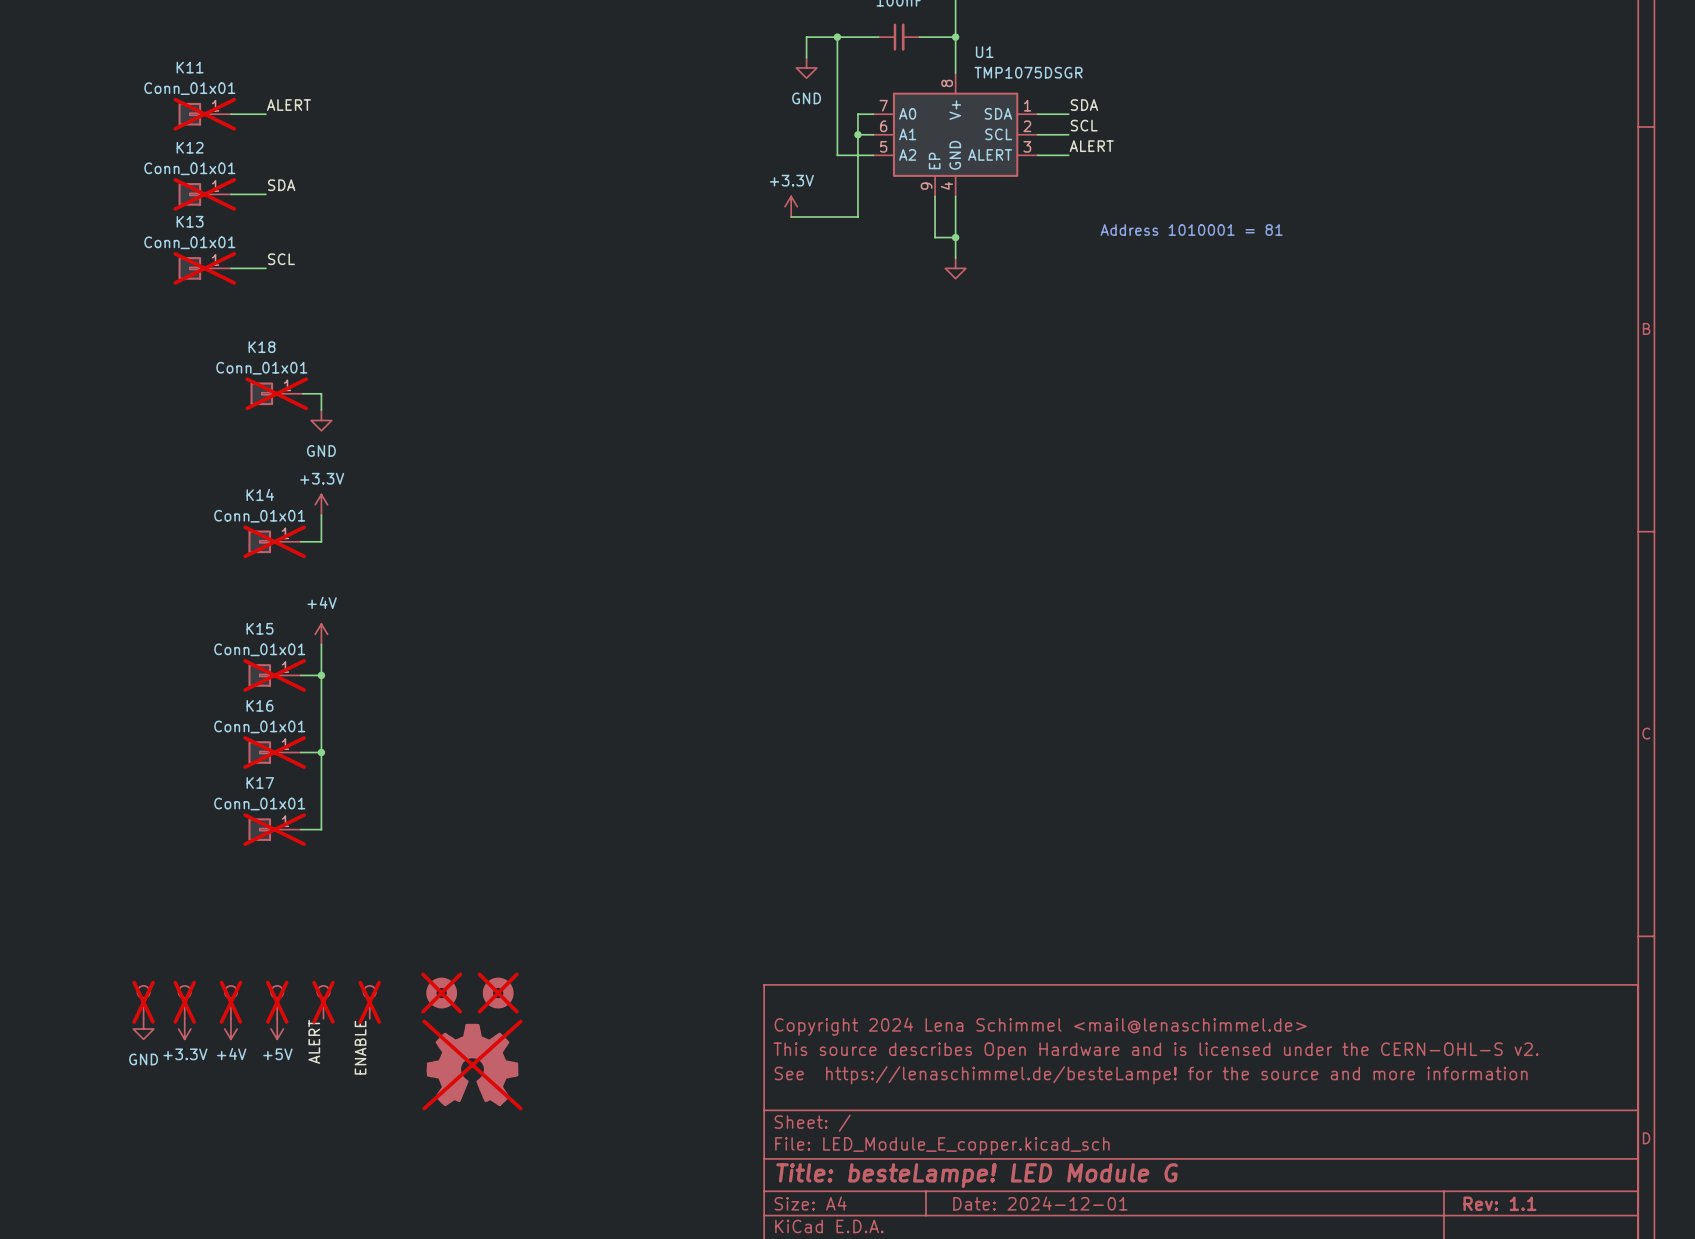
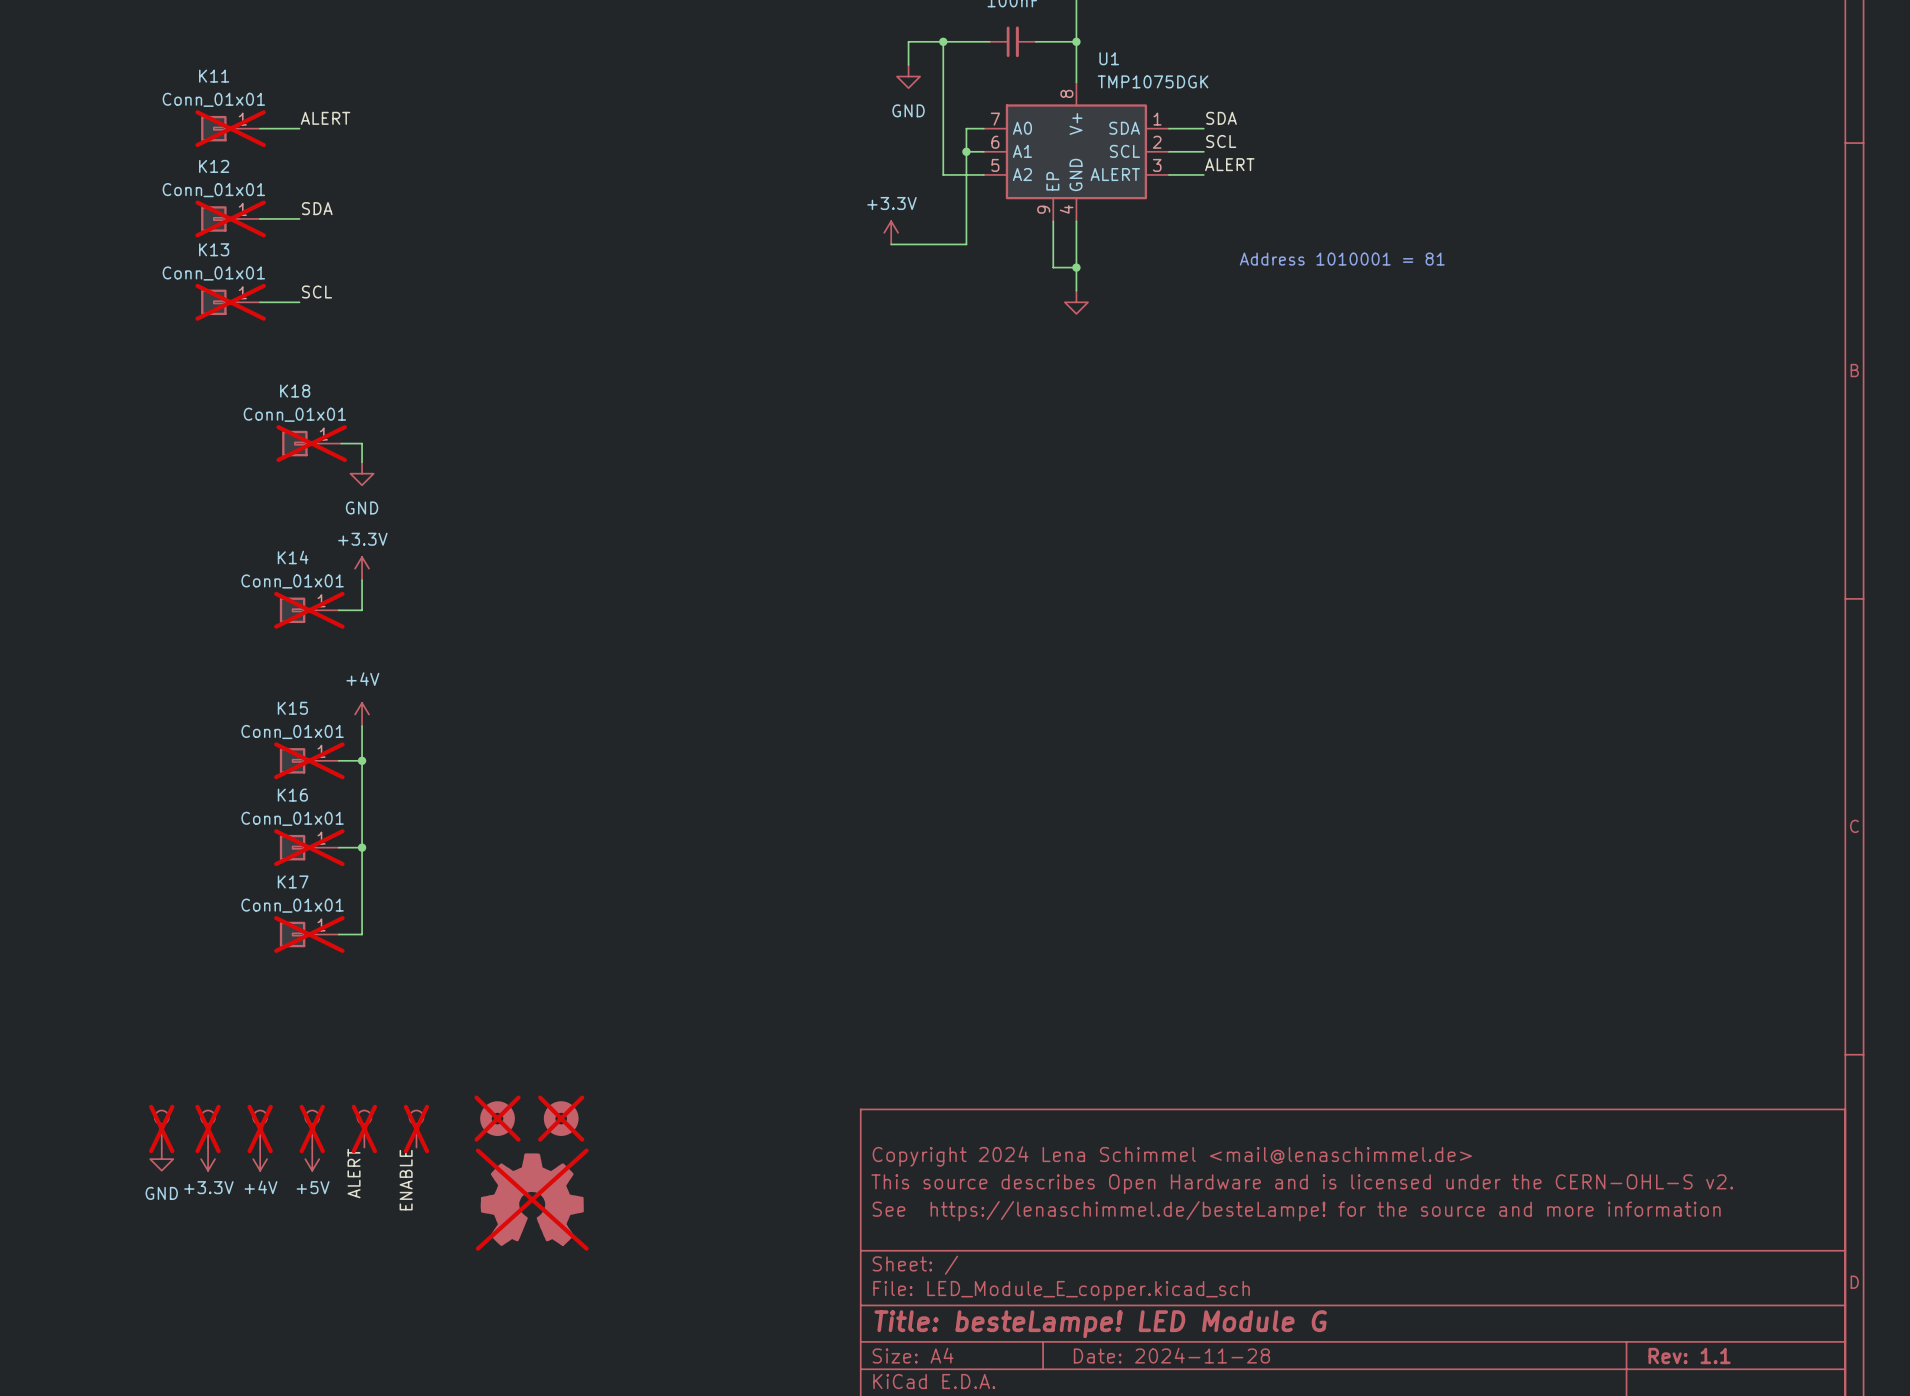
U1 value: TMP1075DSGR (1028, 72) -> TMP1075DGK (1153, 81)
title block: Date: 2024-12-01 (1040, 1203) -> Date: 2024-11-28 (1171, 1355)

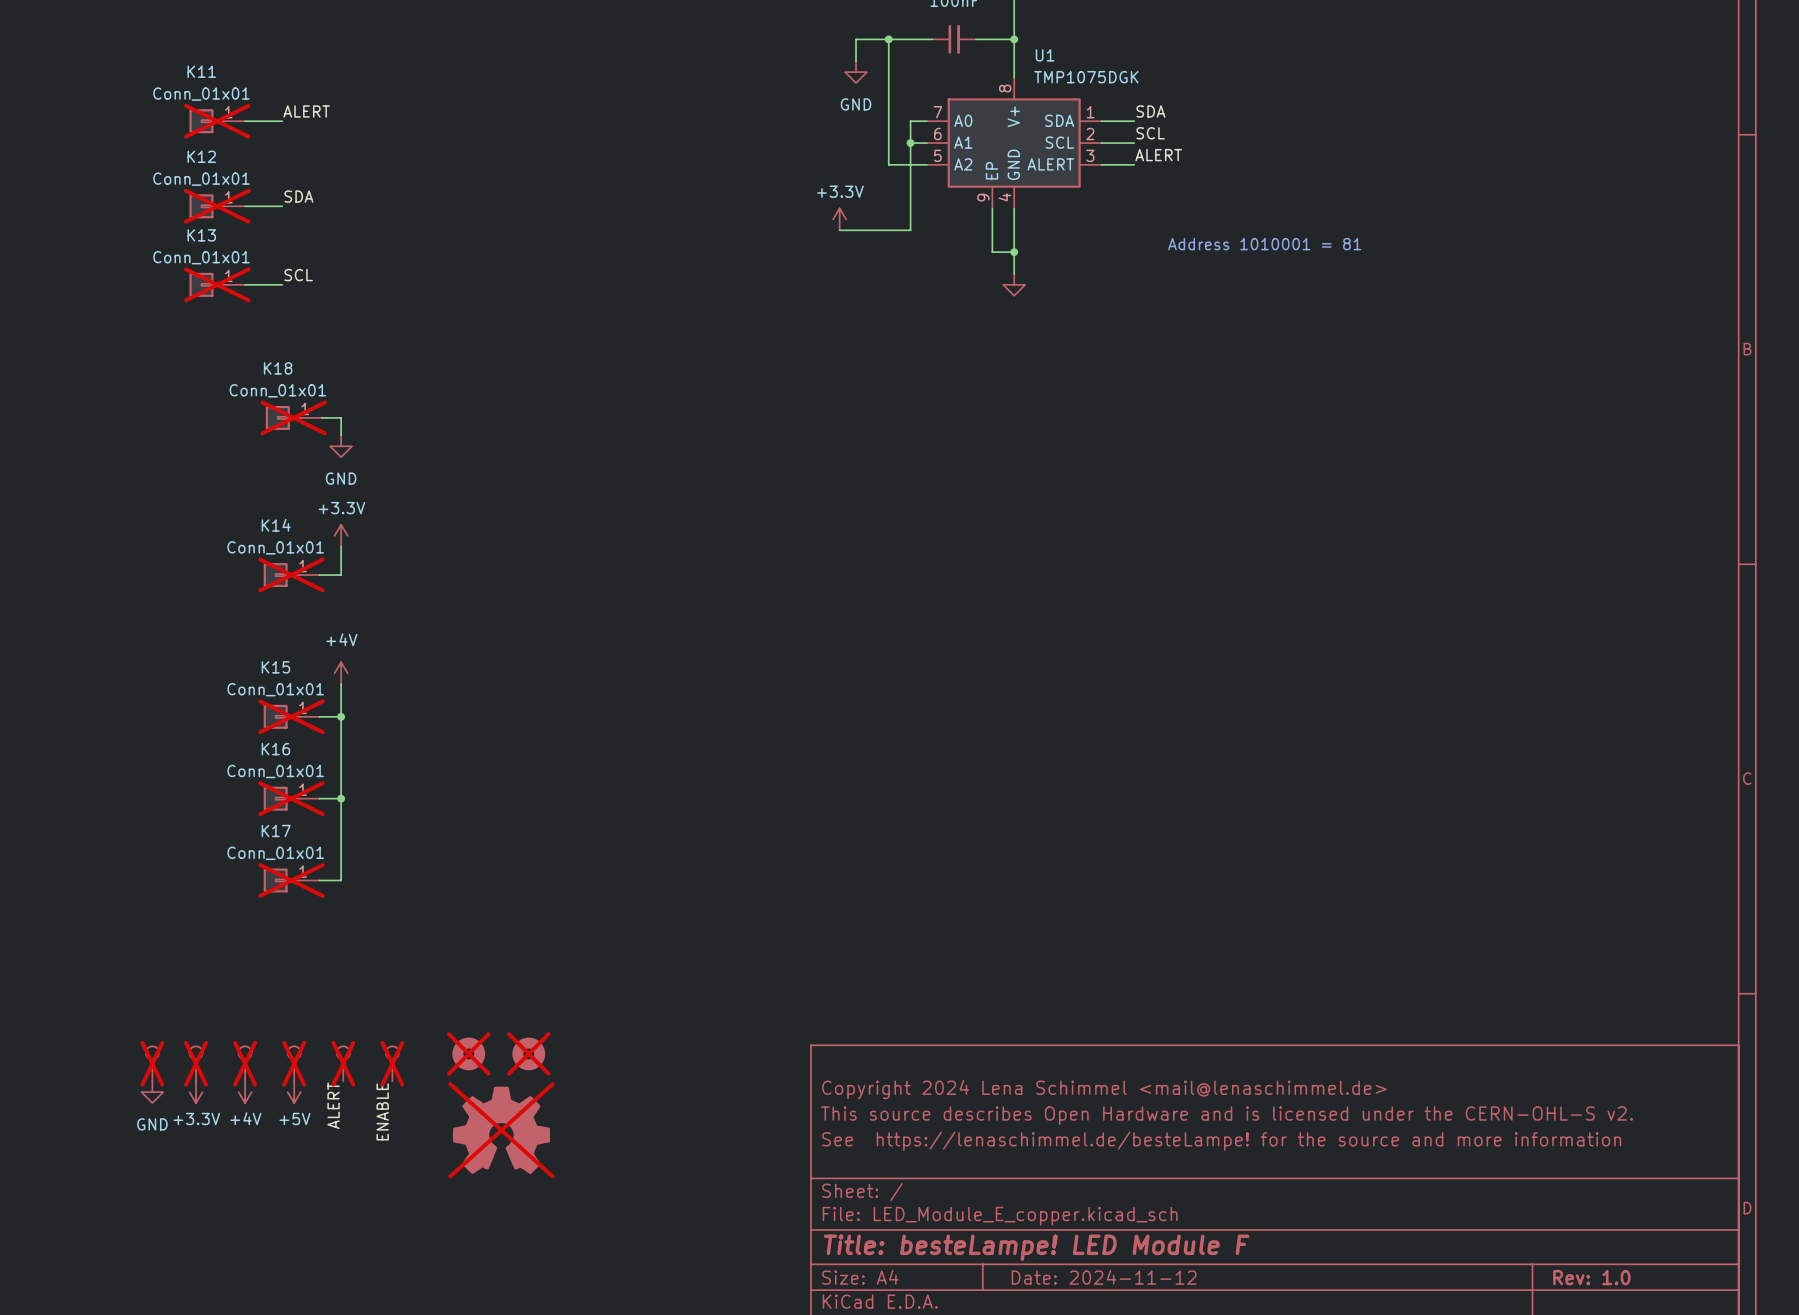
title block: Title: besteLampe! LED Module G (1100, 1324) -> Title: besteLampe! LED Module F (1036, 1247)
title block: Date: 2024-11-28 (1171, 1355) -> Date: 2024-11-12 (1104, 1277)
title block: Rev: 1.1 (1689, 1355) -> Rev: 1.0 (1591, 1277)

